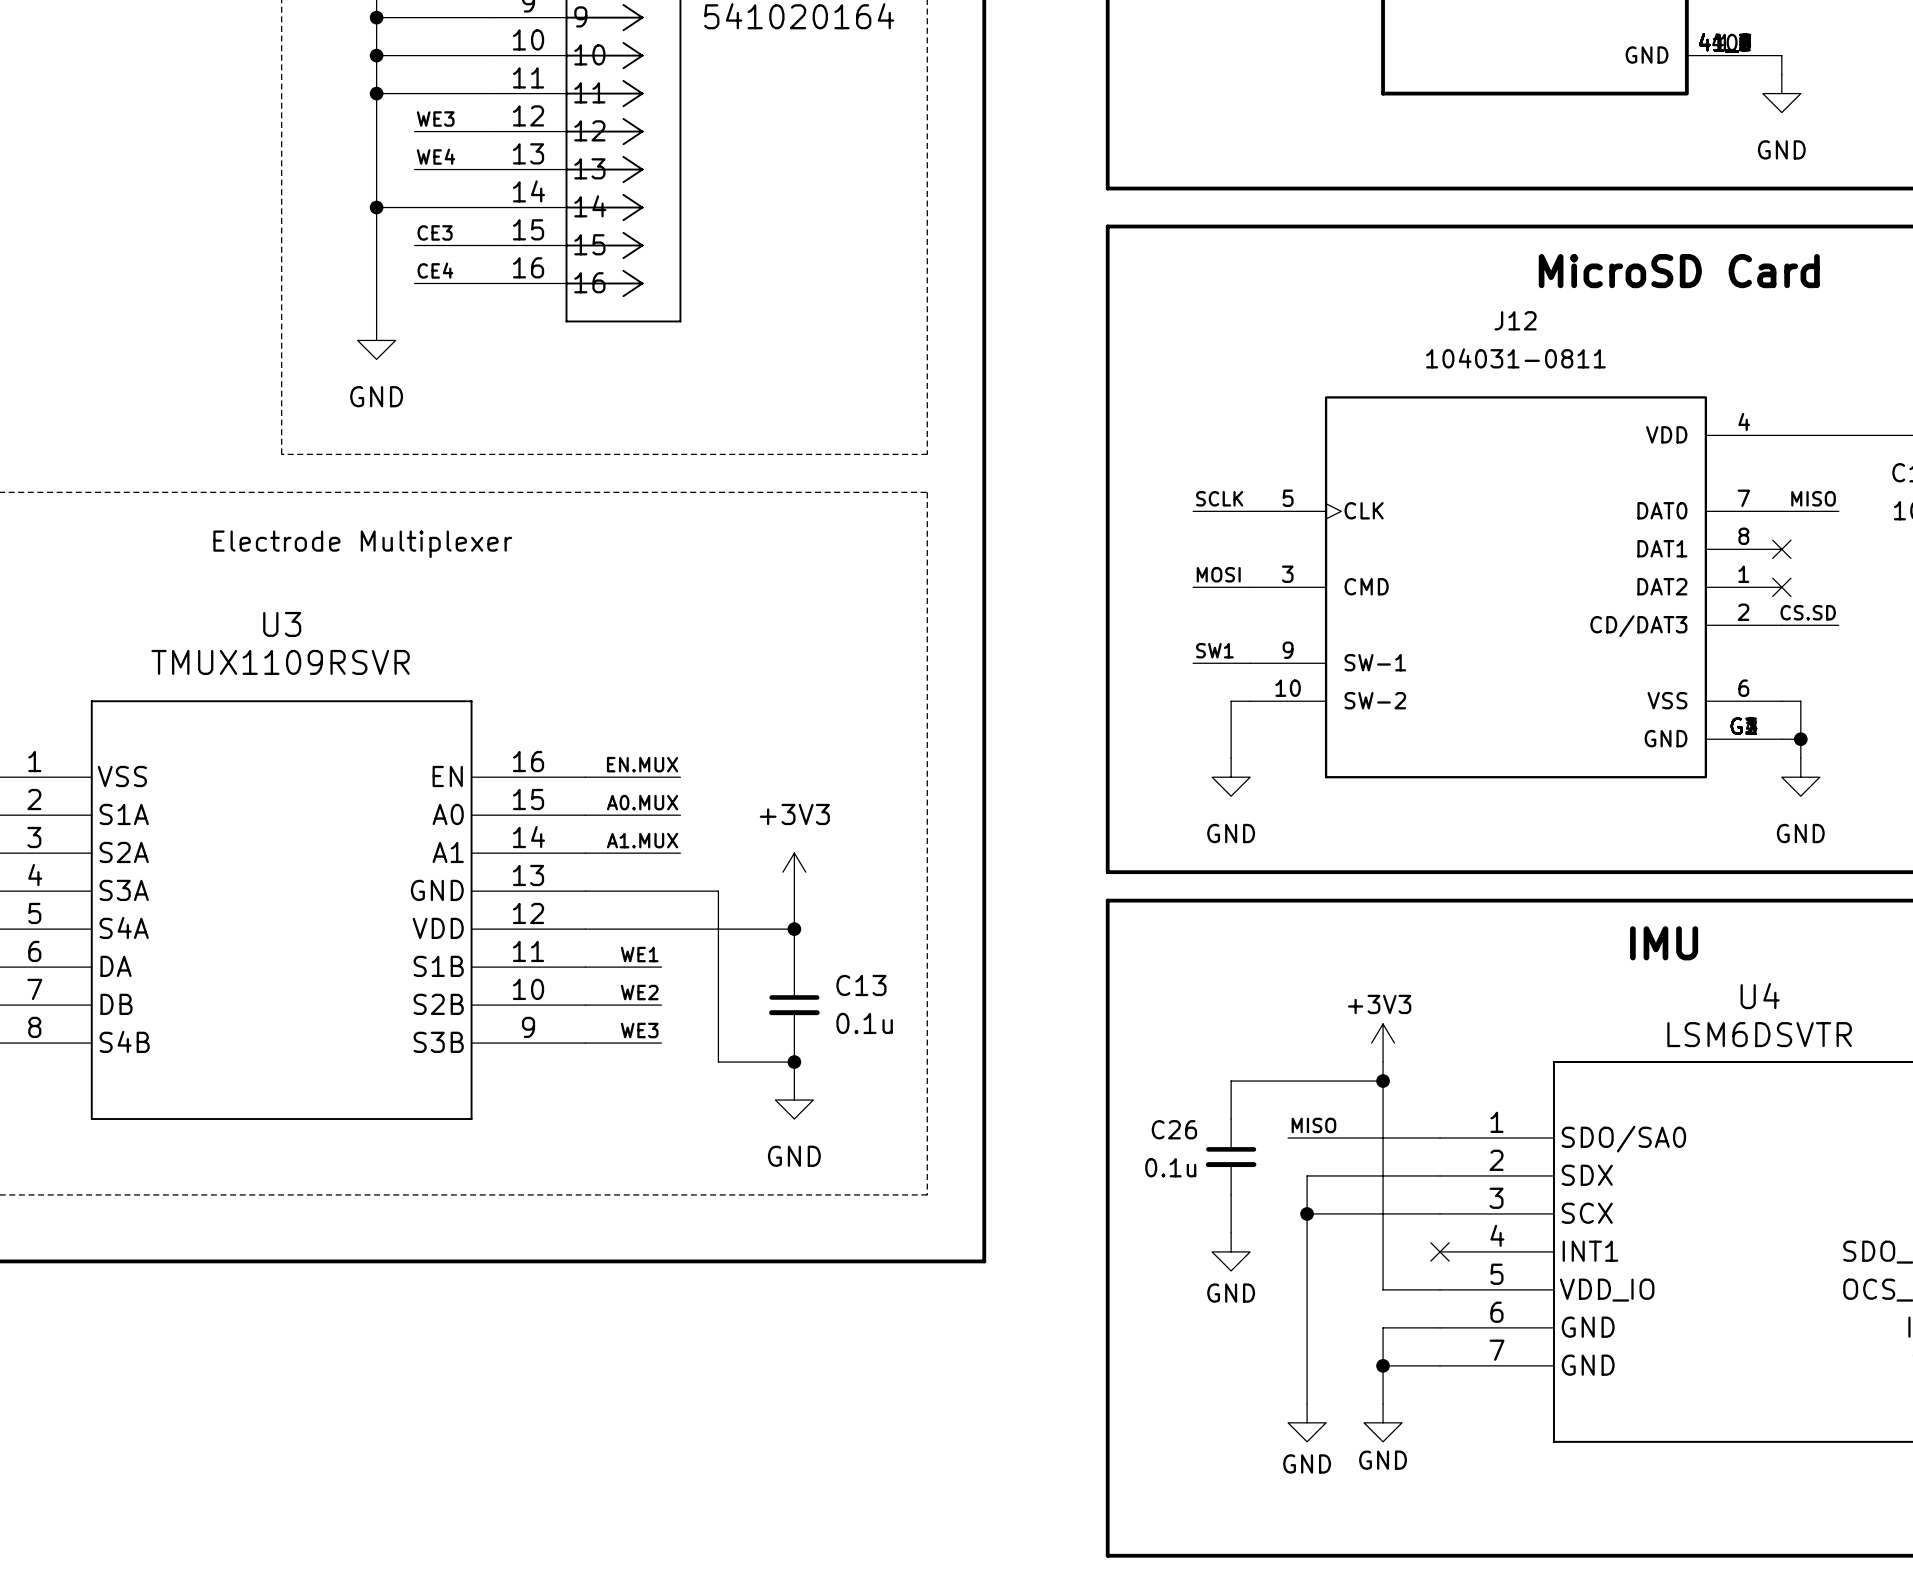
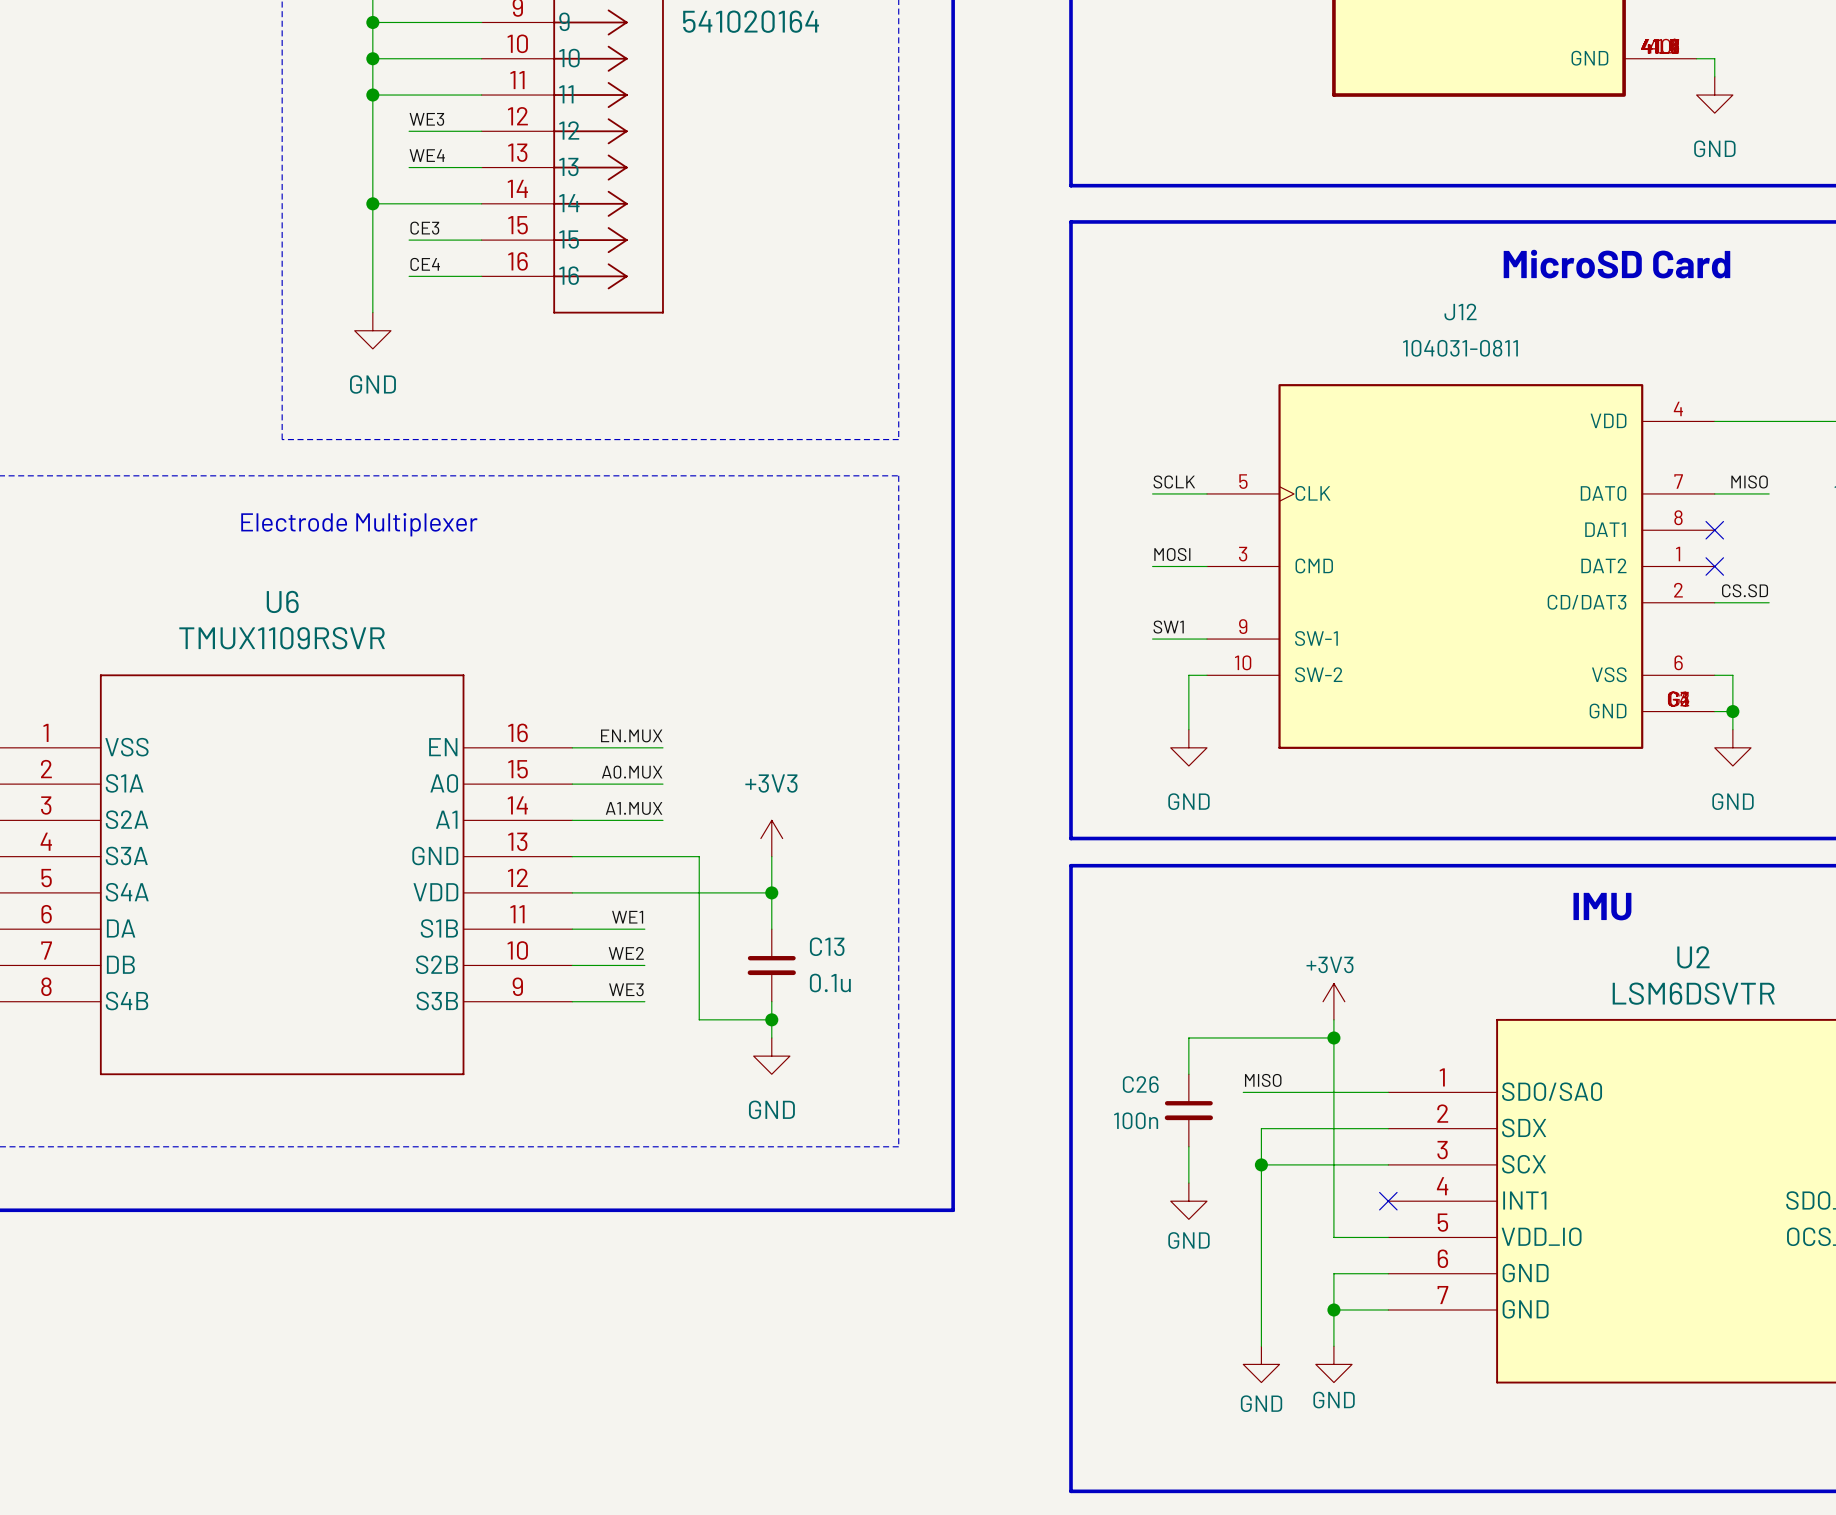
U3 name: U3 (282, 624) -> U6 (282, 601)
U4 name: U4 (1760, 996) -> U2 (1693, 957)
C26 value: 0.1u (1170, 1167) -> 100n (1136, 1120)

